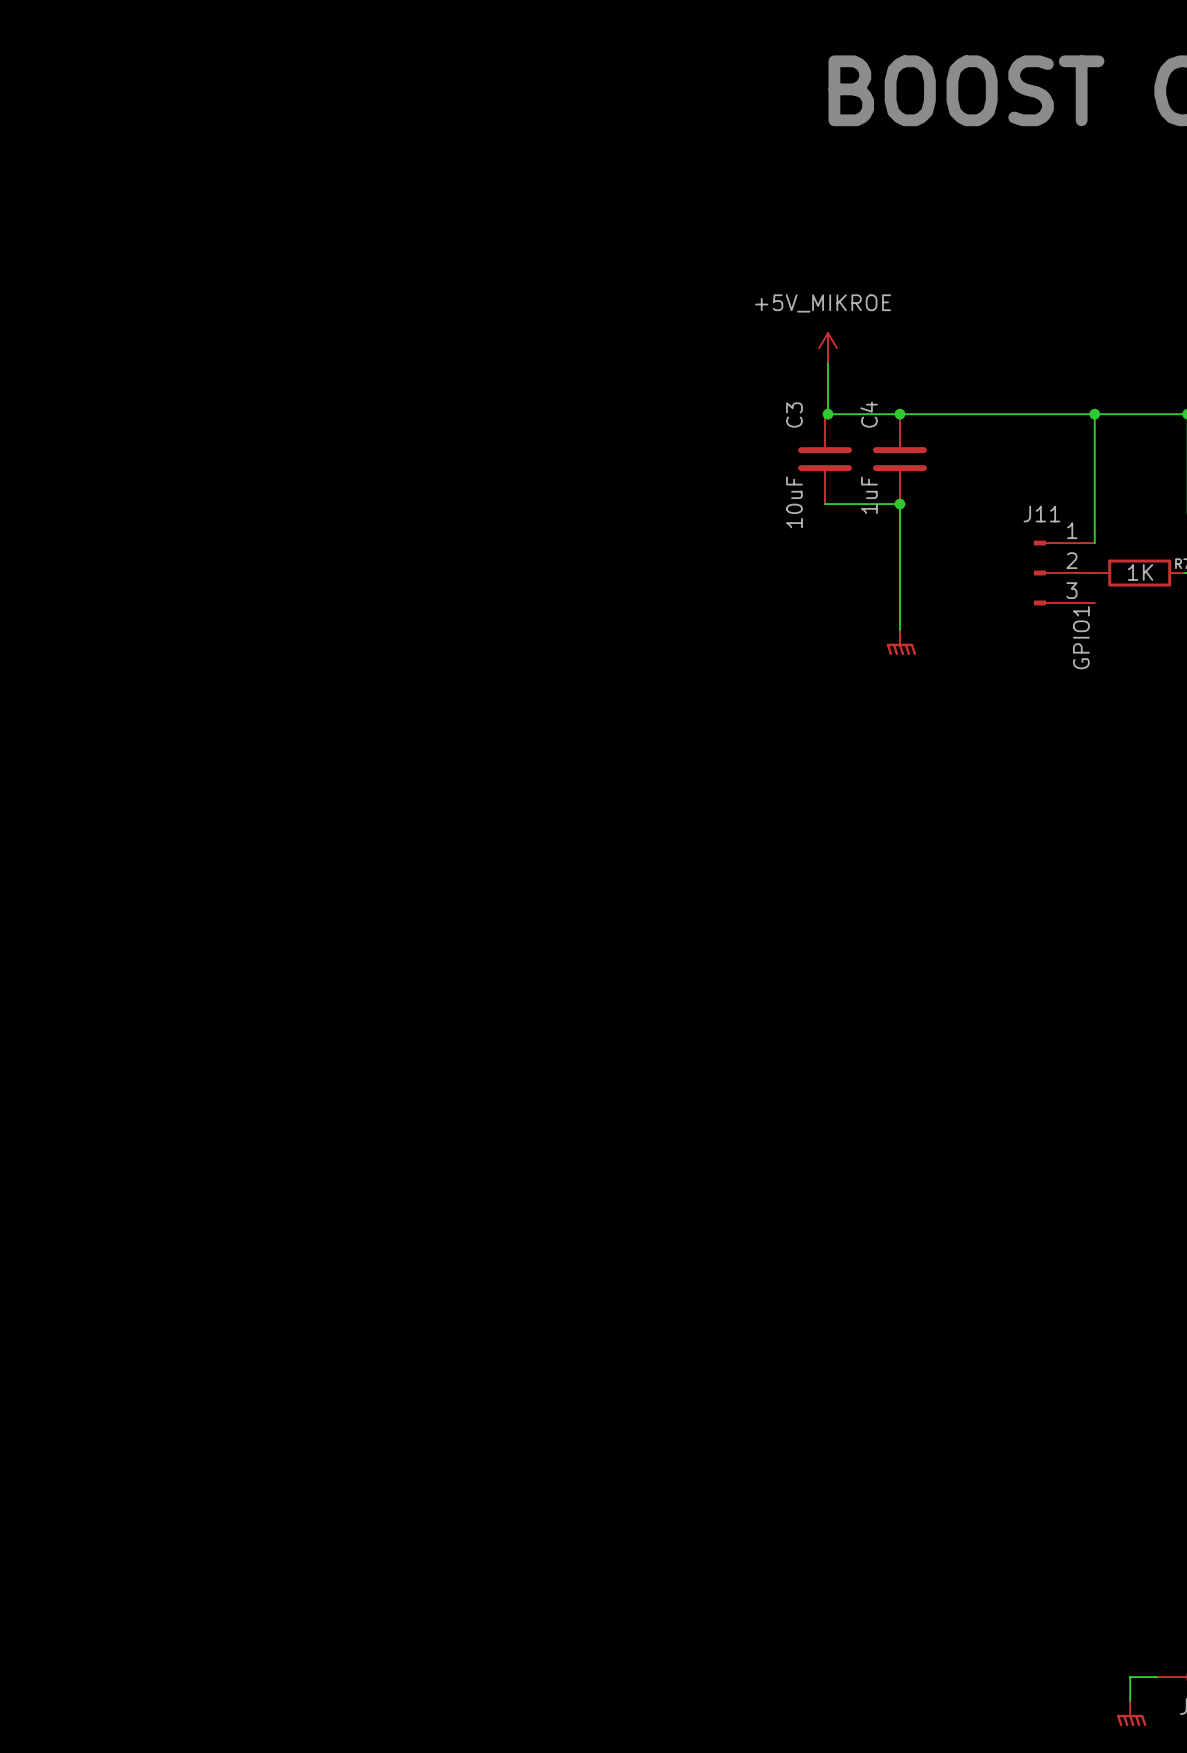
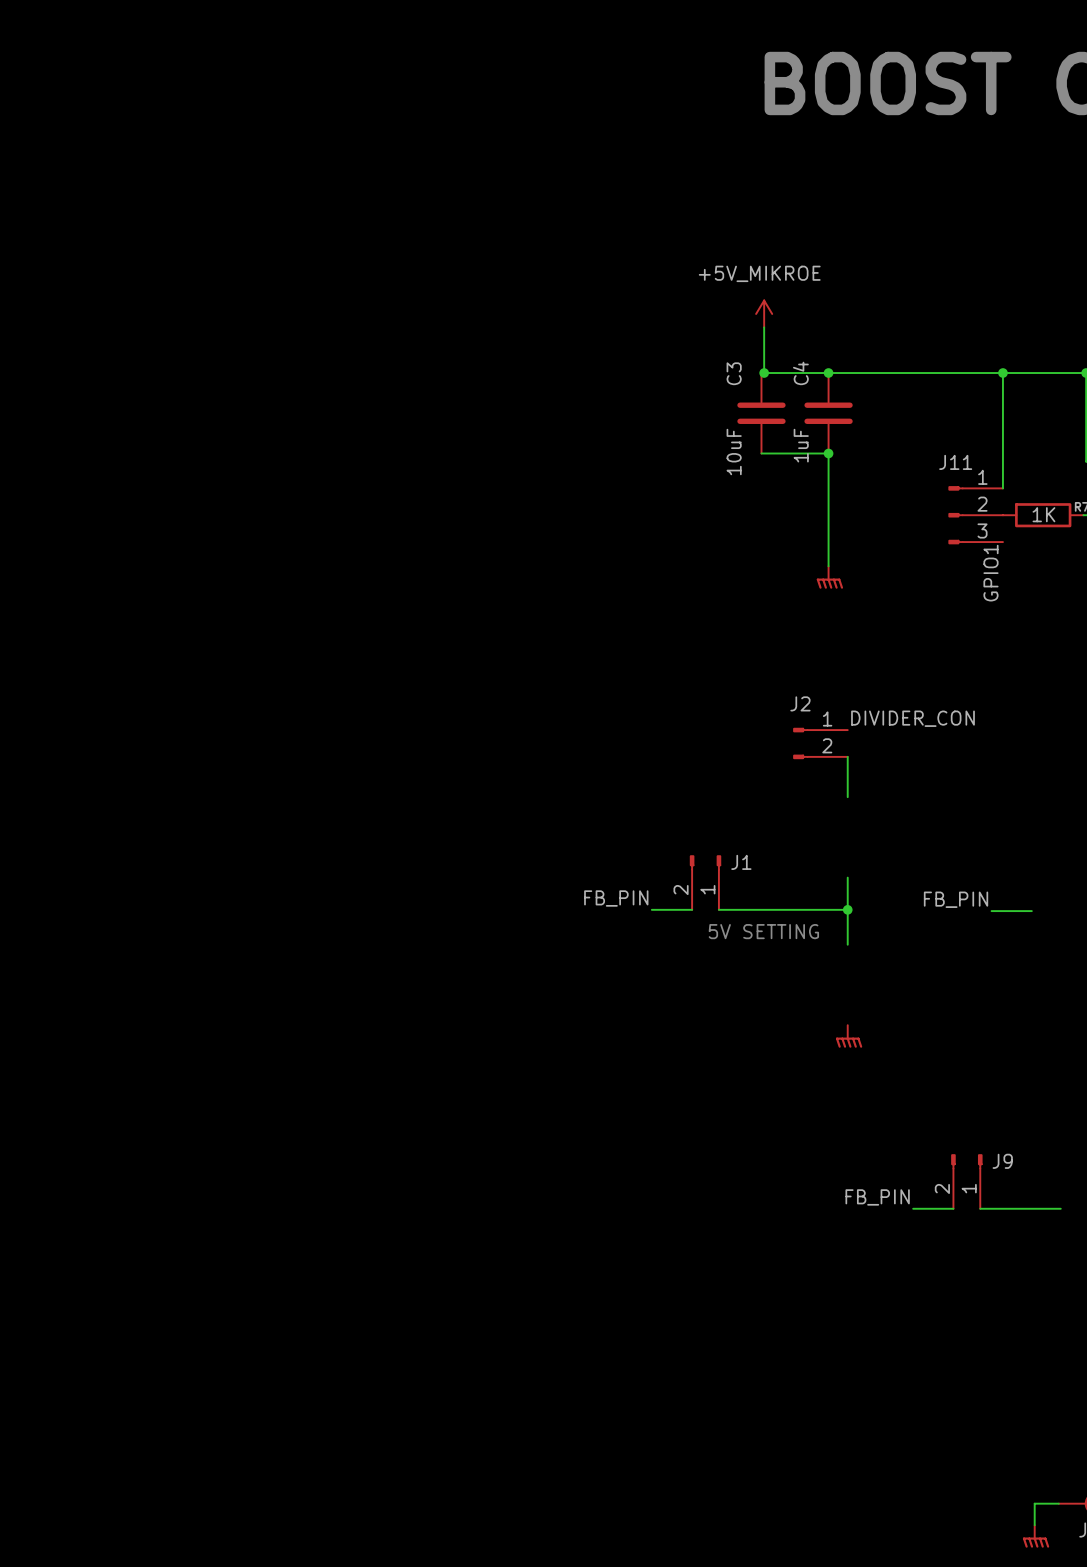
label: none -> DIVIDER_CON (912, 718)
J2: none -> (820, 743)
wire: none -> (847, 756) (847, 797)
wire: none -> (847, 877) (847, 944)
J1: none -> (705, 882)
label: none -> FB_PIN (616, 898)
label: none -> FB_PIN (956, 899)
wire: none -> (651, 909) (692, 909)
wire: none -> (718, 909) (847, 909)
junction: none -> (847, 909)
wire: none -> (991, 911) (1031, 911)
text: none -> 5V SETTING (763, 931)
power symbol: none -> (849, 1036)
J9: none -> (966, 1181)
label: none -> FB_PIN (877, 1197)
wire: none -> (913, 1208) (953, 1208)
wire: none -> (980, 1208) (1060, 1208)

